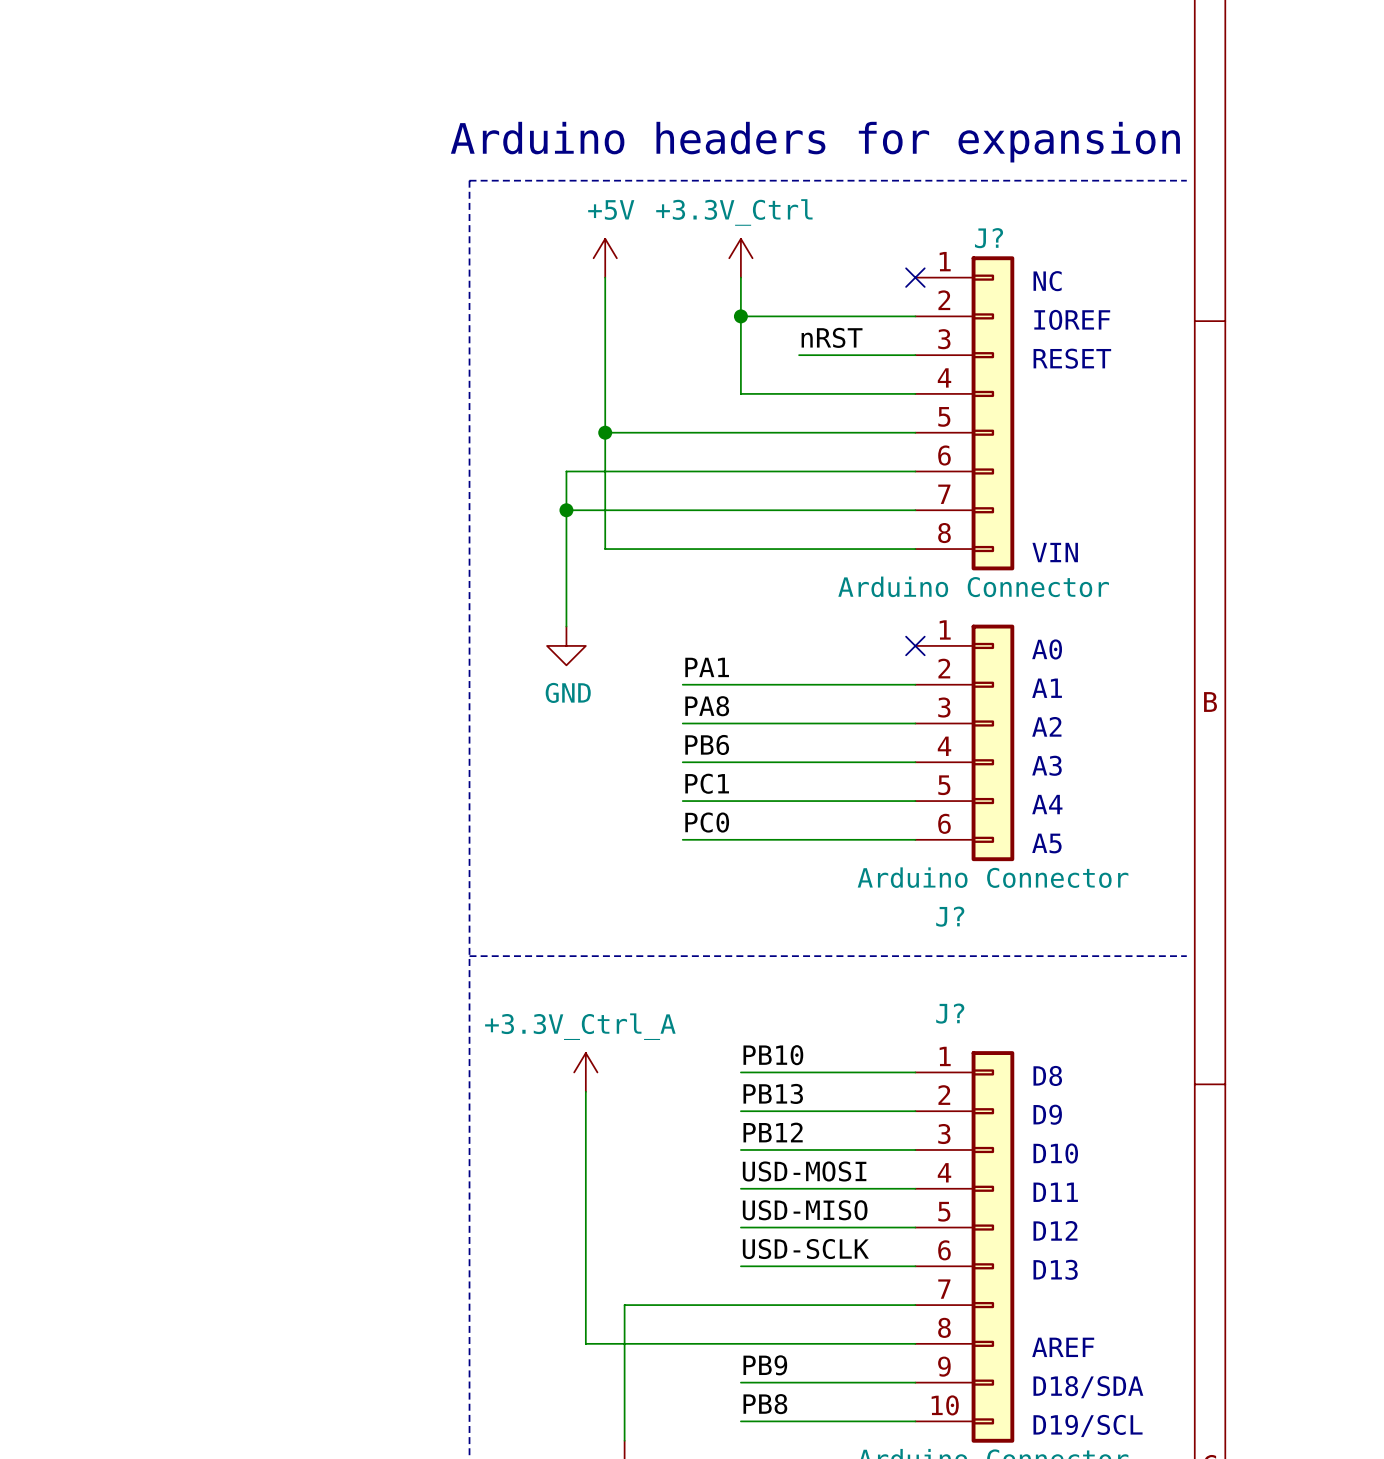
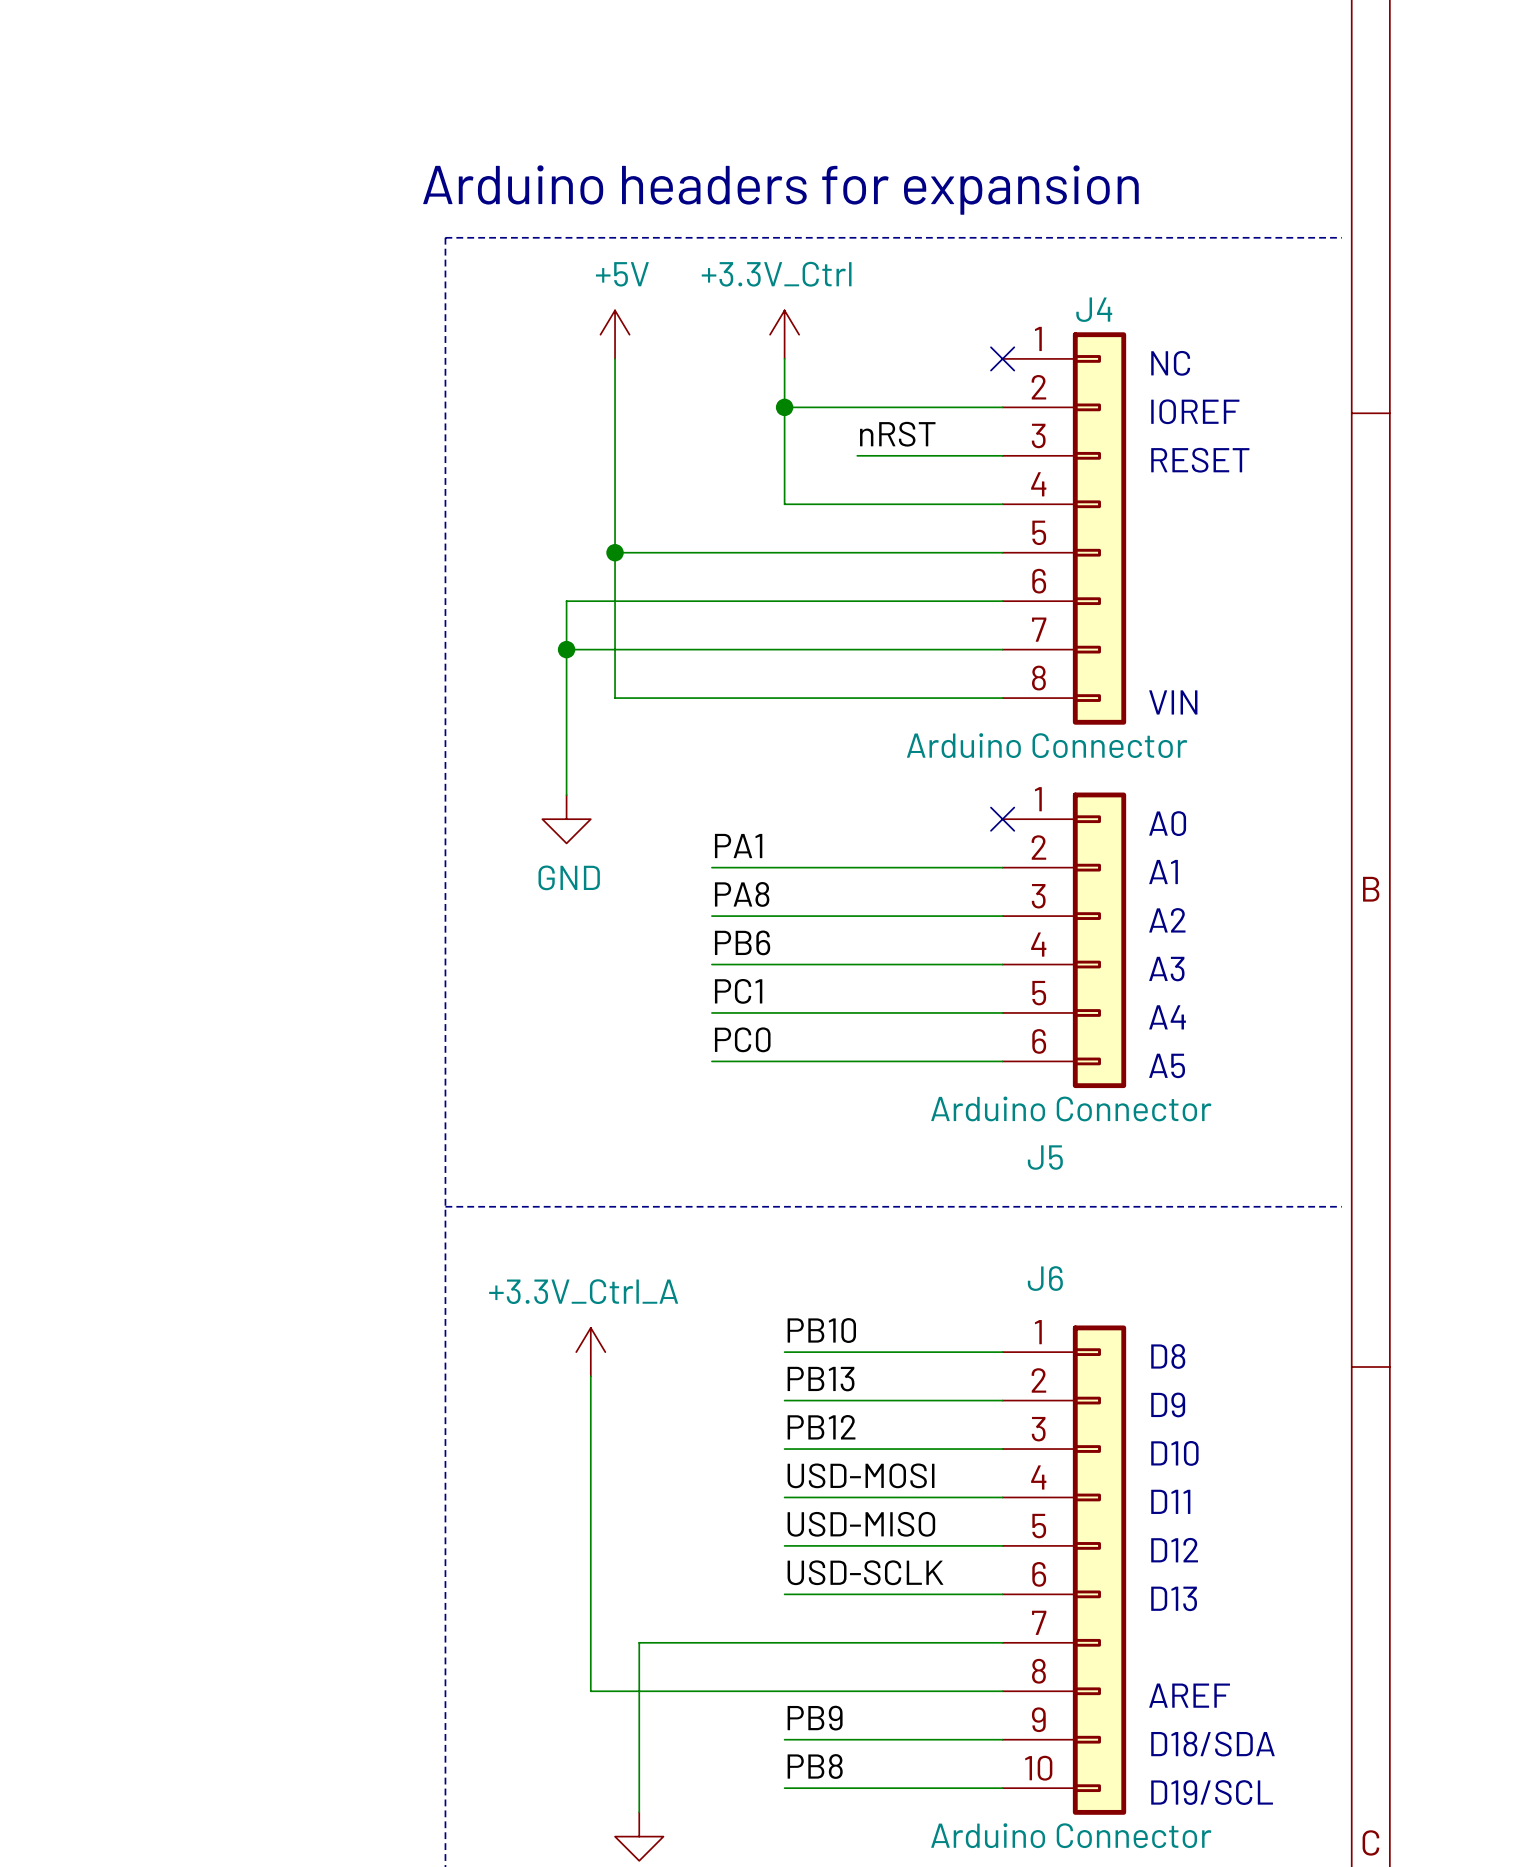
J? name: J? (989, 238) -> J4 (1094, 309)
J? name: J? (950, 916) -> J5 (1045, 1157)
J? name: J? (950, 1013) -> J6 (1045, 1278)

